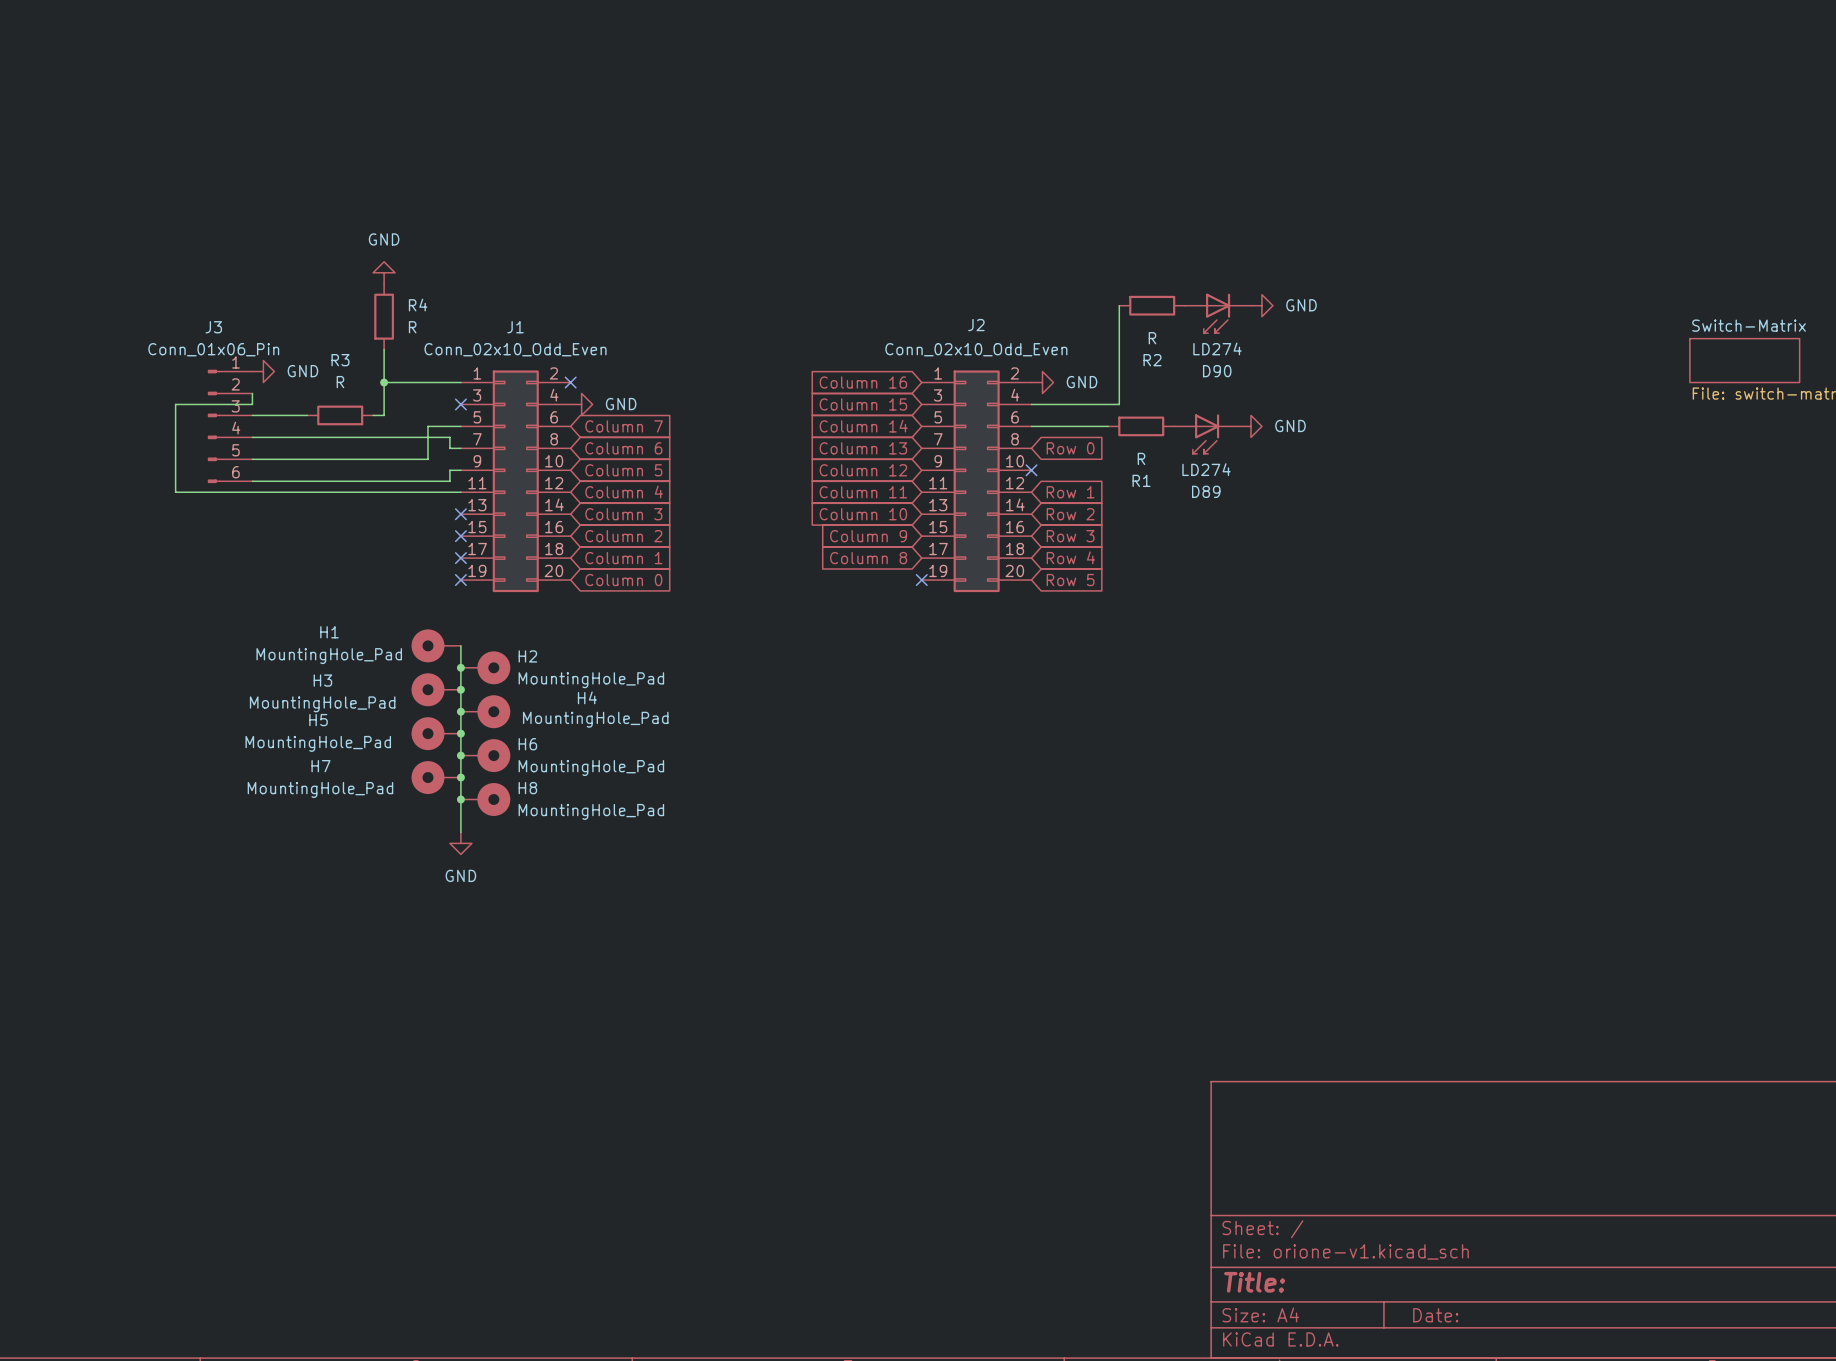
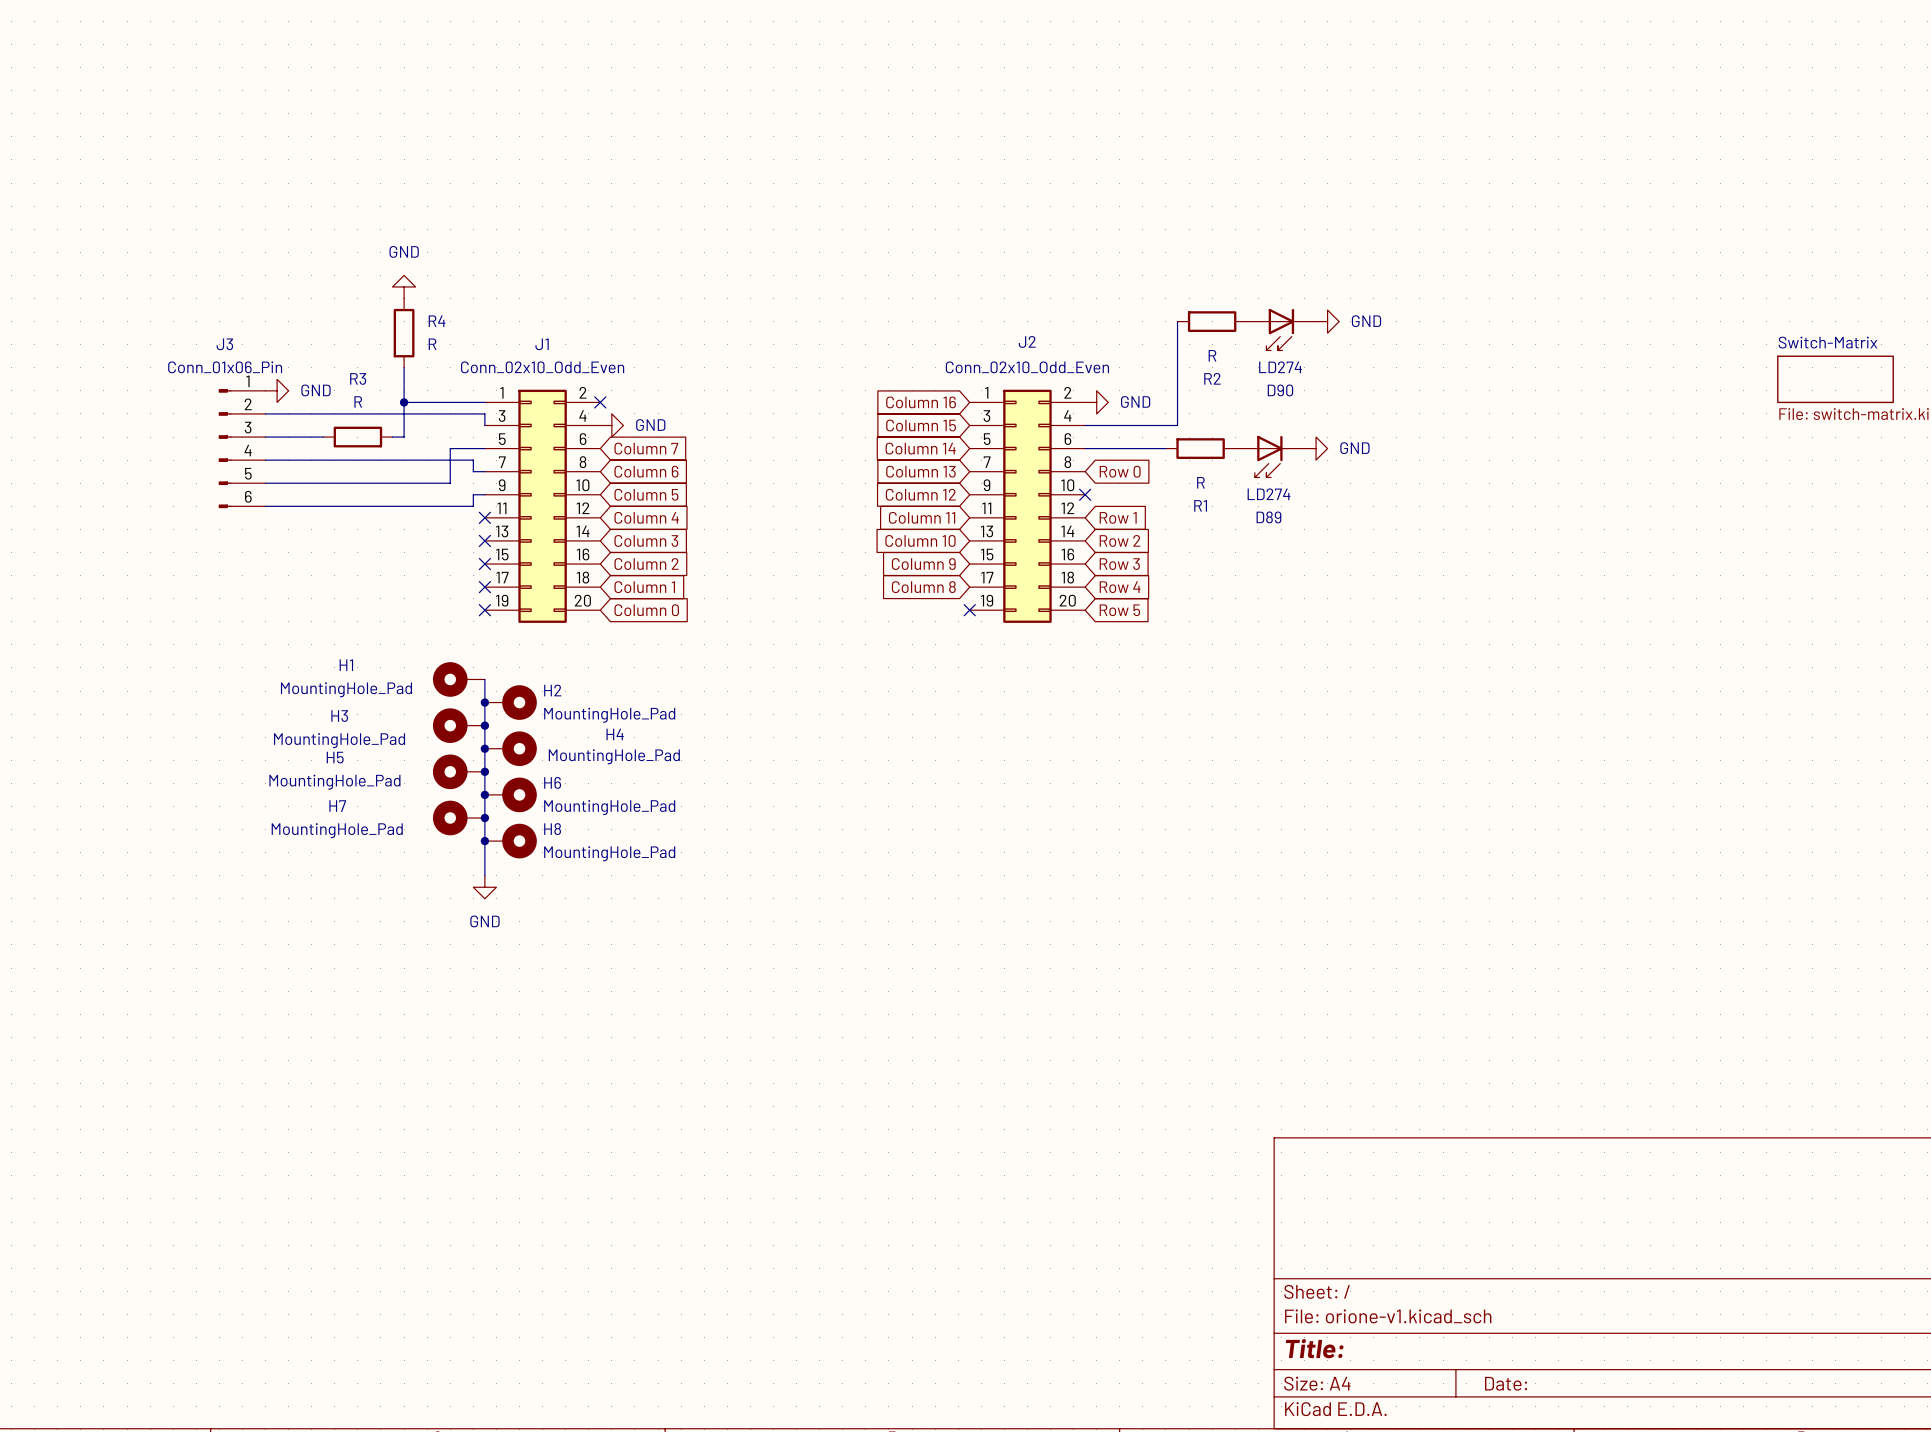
wire: (252, 393) (252, 404) (175, 404) (175, 492) (460, 492) -> (265, 413) (484, 413) (484, 425)
no-connect mark: (460, 404) -> none
no-connect mark: none -> (484, 517)

